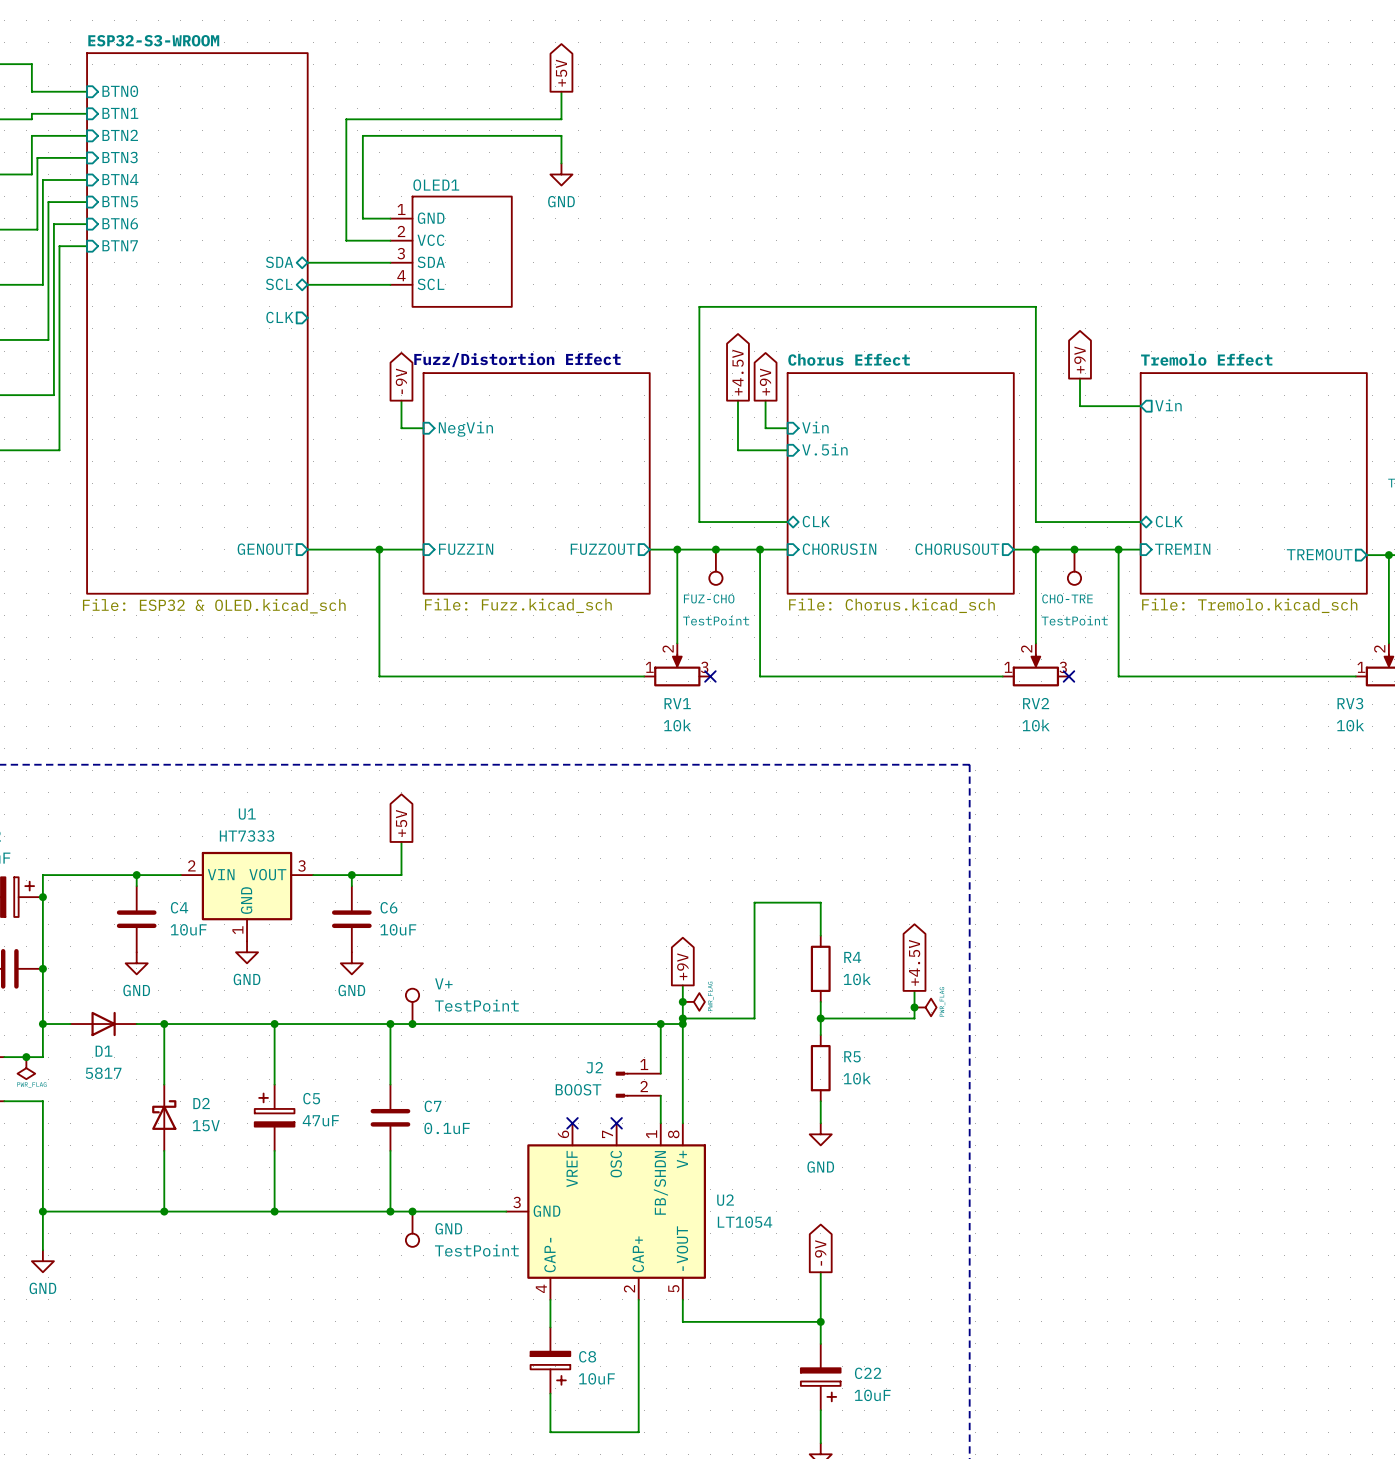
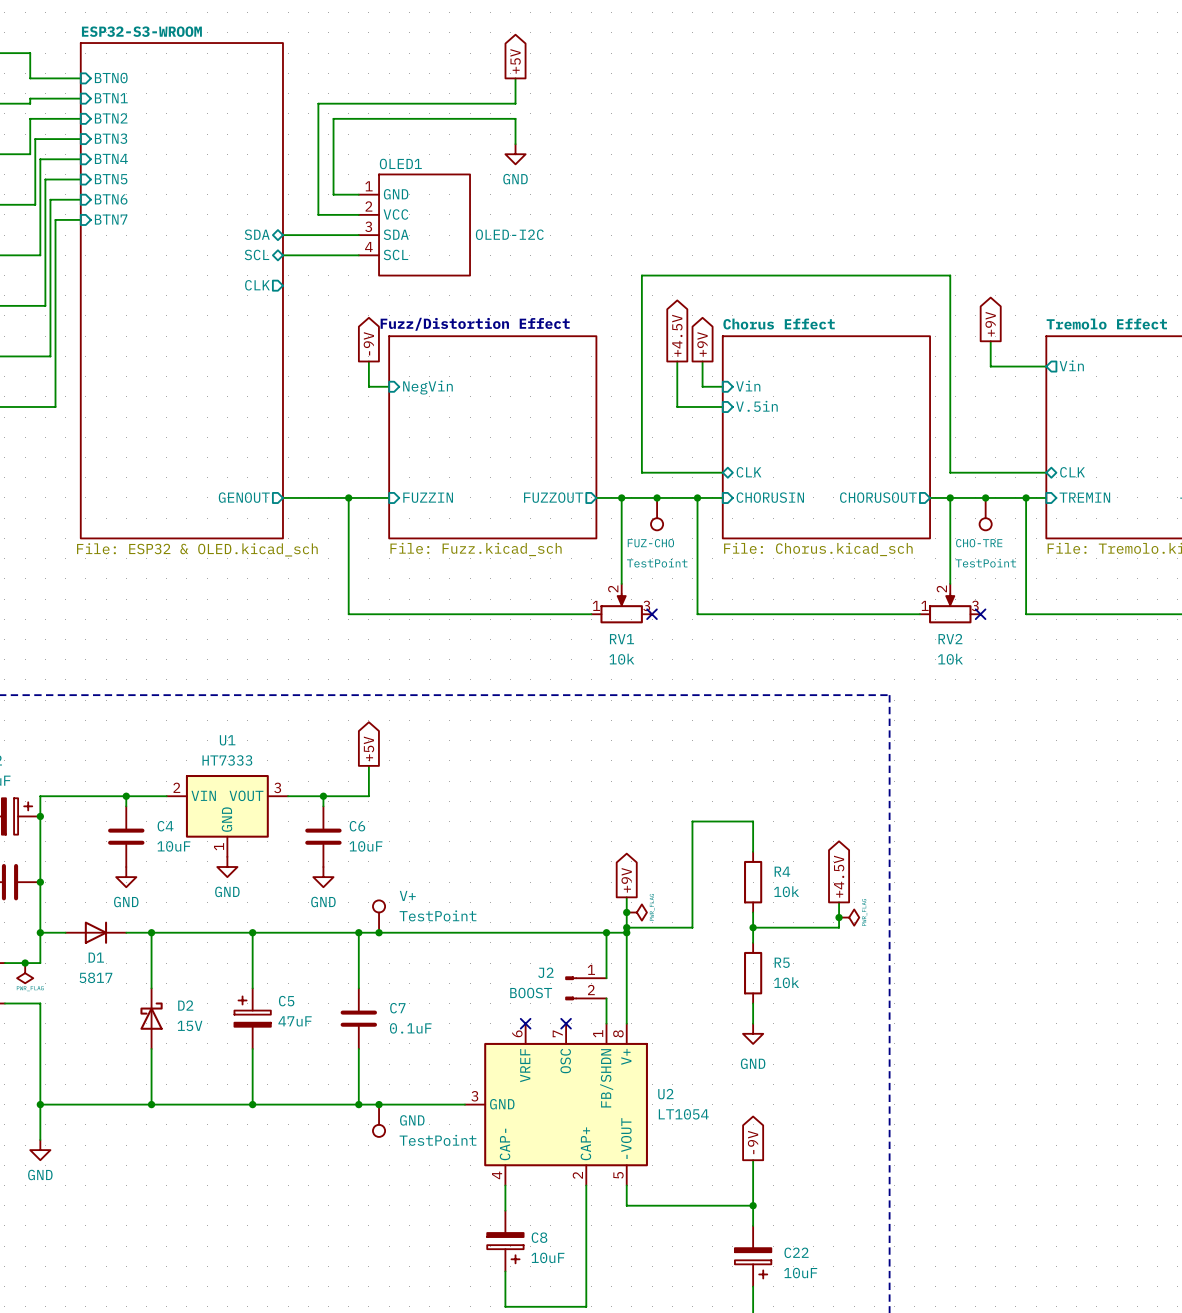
OLED1 value: none -> OLED-I2C (509, 234)

